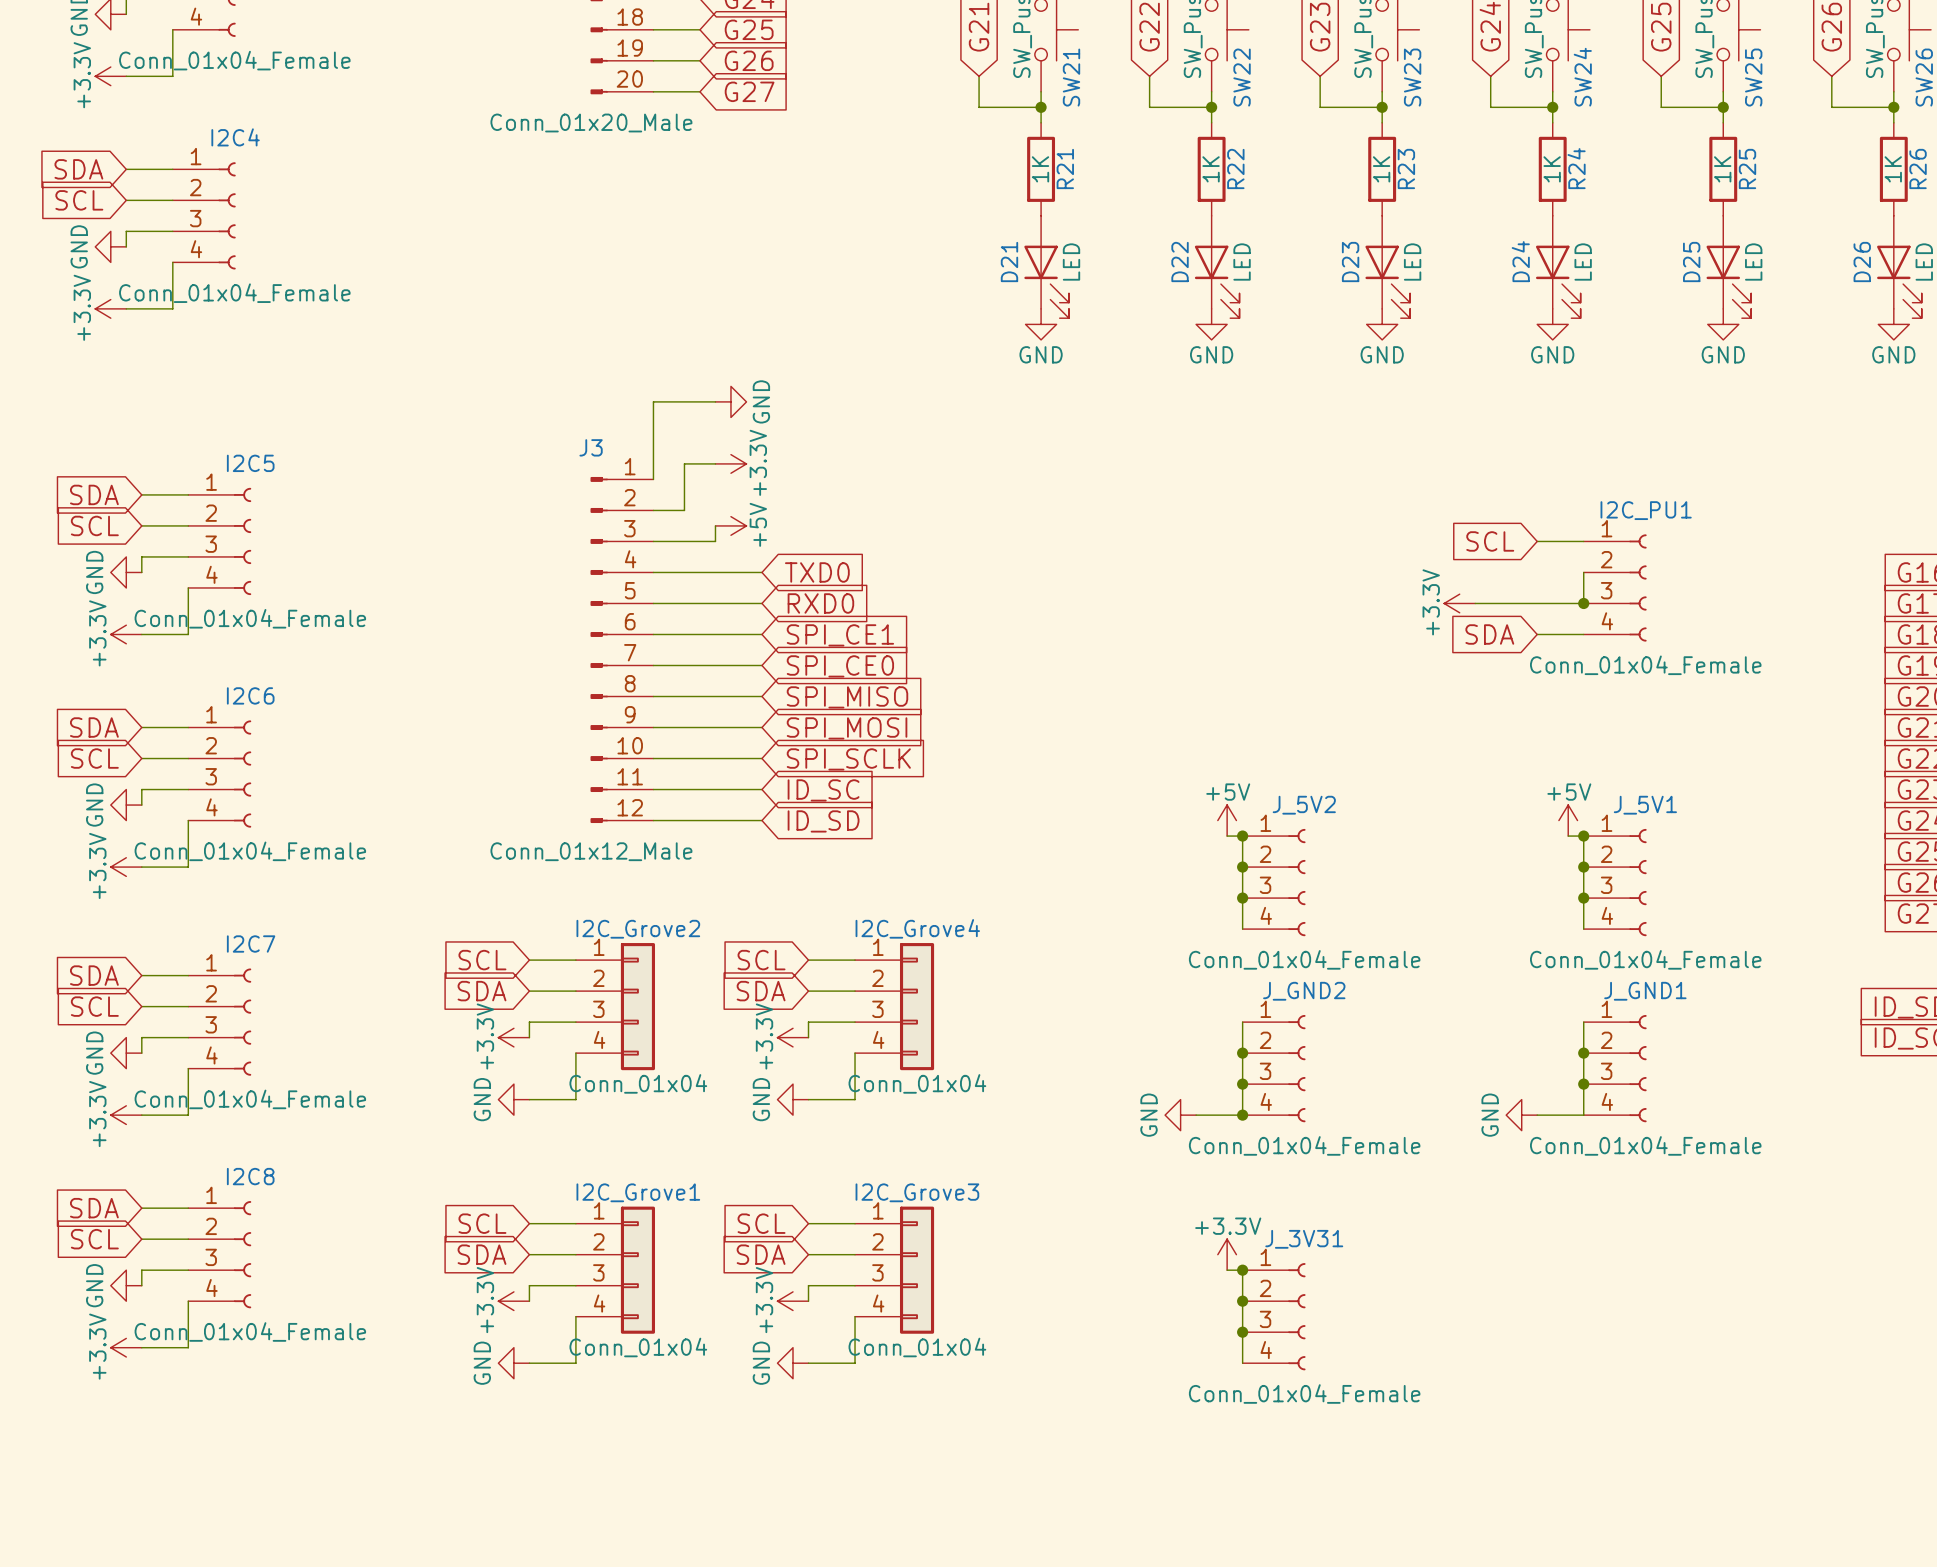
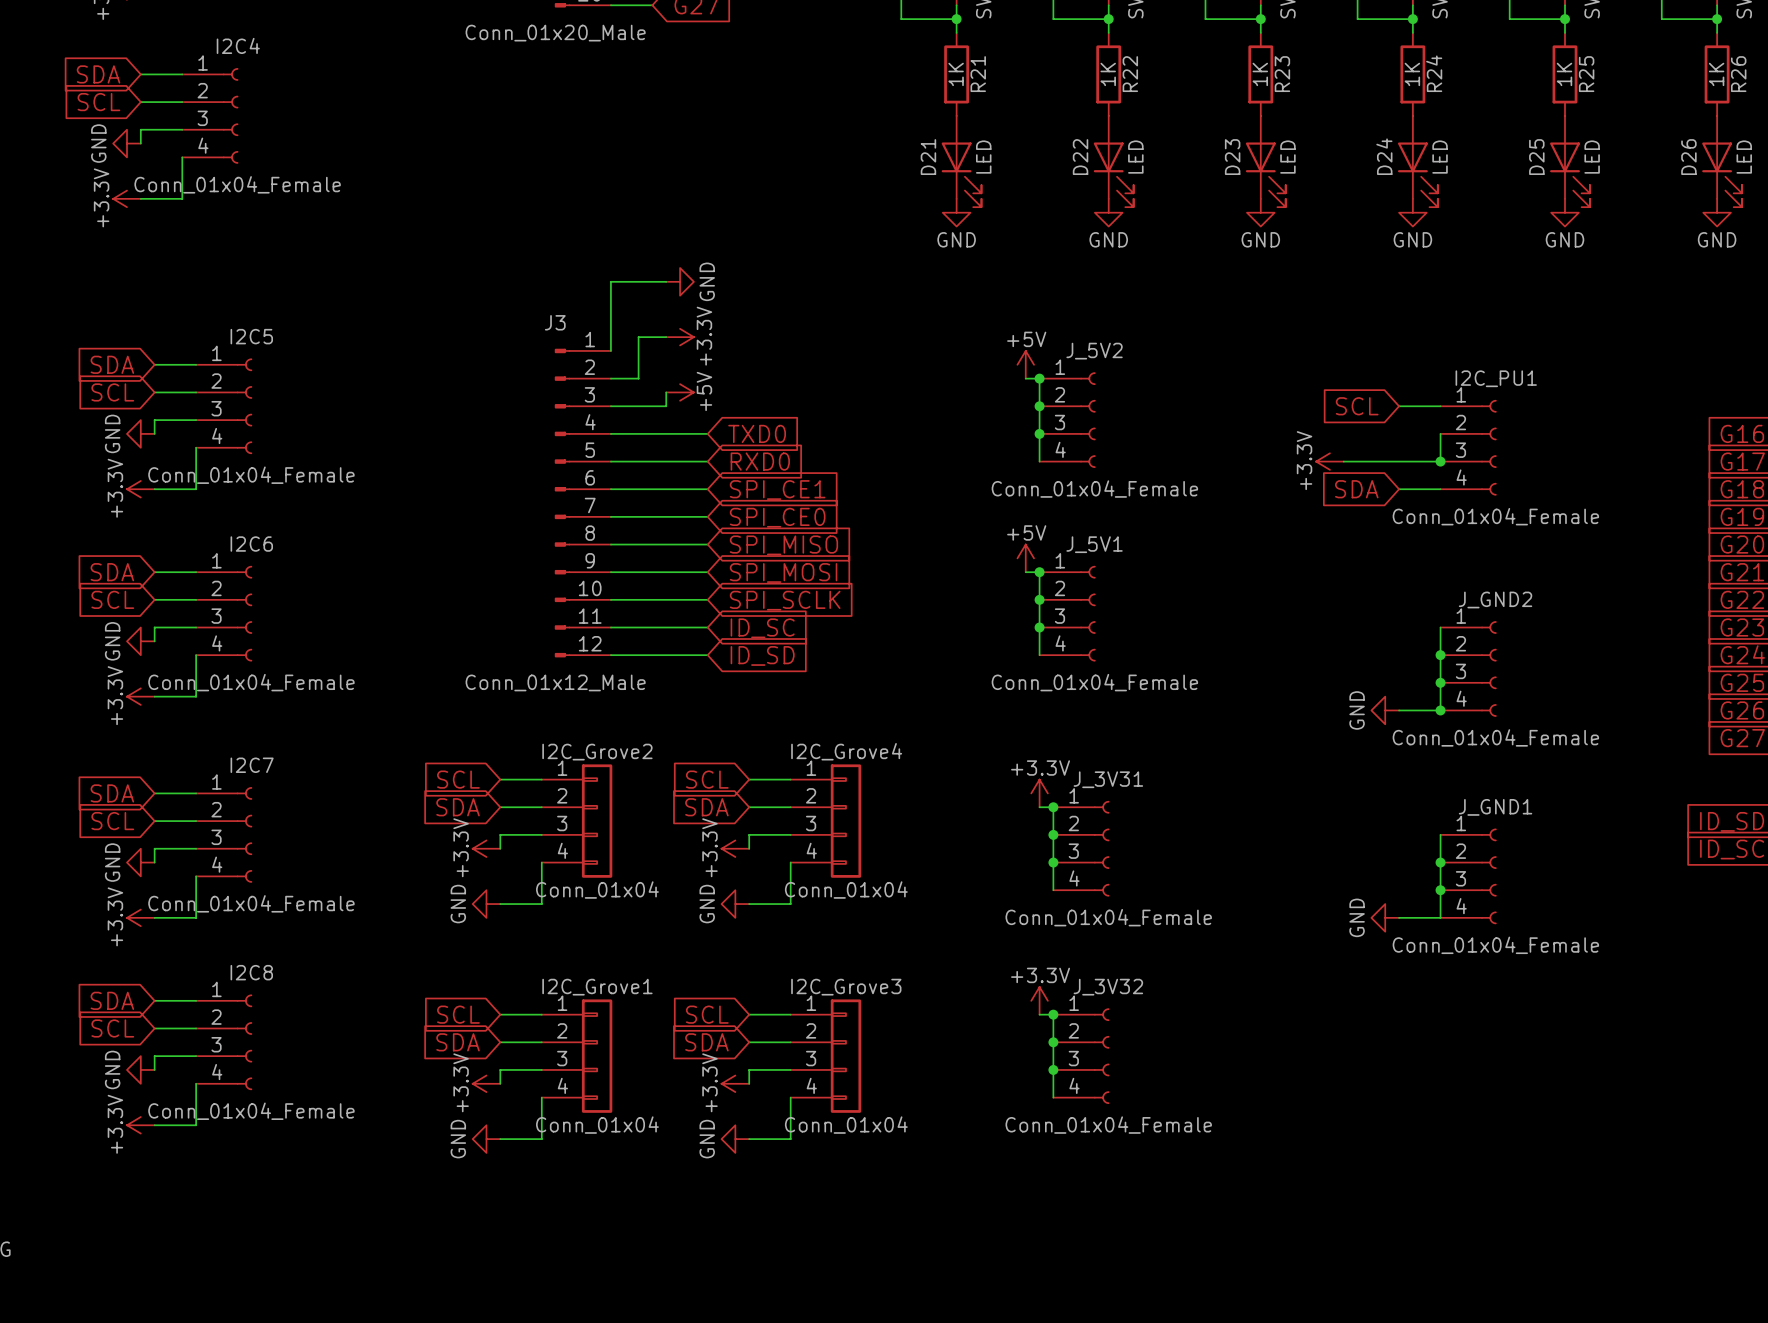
power symbol: none -> +5V (1025, 364)
wire: none -> (1025, 378) (1039, 378) (1039, 461)
junction: none -> (1039, 378)
junction: none -> (1039, 406)
junction: none -> (1039, 433)
junction: none -> (1039, 572)
junction: none -> (1039, 599)
junction: none -> (1039, 627)
power symbol position: +5V (1227, 820) -> +5V (1025, 558)
power symbol: +5V (1568, 820) -> none
junction: none -> (1440, 655)
wire: (1227, 836) (1242, 836) (1242, 929) -> (1025, 572) (1039, 572) (1039, 655)
junction: (1242, 836) -> none
wire: (1568, 836) (1583, 836) -> (1440, 627) (1440, 668)
junction: (1583, 836) -> none
junction: none -> (1440, 682)
junction: (1242, 867) -> none
junction: (1583, 867) -> none
J_5V2 position: (1274, 882) -> (1067, 420)
power symbol: none -> GND (1385, 710)
wire: (1583, 882) (1583, 929) -> (1440, 710) (1399, 710)
junction: none -> (1440, 710)
J_5V1 position: (1615, 882) -> (1067, 613)
junction: (1242, 898) -> none
junction: (1583, 898) -> none
power symbol: none -> +3.3V (1039, 793)
wire: none -> (1039, 807) (1053, 807) (1053, 890)
junction: none -> (1053, 807)
junction: none -> (1053, 834)
wire: (1242, 1022) (1242, 1115) (1196, 1115) -> none
junction: none -> (1053, 862)
junction: (1242, 1053) -> none
J_GND2 position: (1274, 1068) -> (1468, 668)
junction: (1242, 1084) -> none
power symbol: GND (1180, 1115) -> none
junction: (1242, 1115) -> none
junction: none -> (1053, 1014)
junction: none -> (1053, 1042)
power symbol position: +3.3V (1227, 1254) -> +3.3V (1039, 1000)
J_3V32: none -> Conn_01x04_Female (1081, 1056)
wire: (1227, 1270) (1242, 1270) (1242, 1363) -> (1039, 1014) (1053, 1014) (1053, 1097)
junction: (1242, 1270) -> none
junction: none -> (1053, 1069)
junction: (1242, 1301) -> none
J_3V31 position: (1274, 1316) -> (1081, 848)
junction: (1242, 1332) -> none

